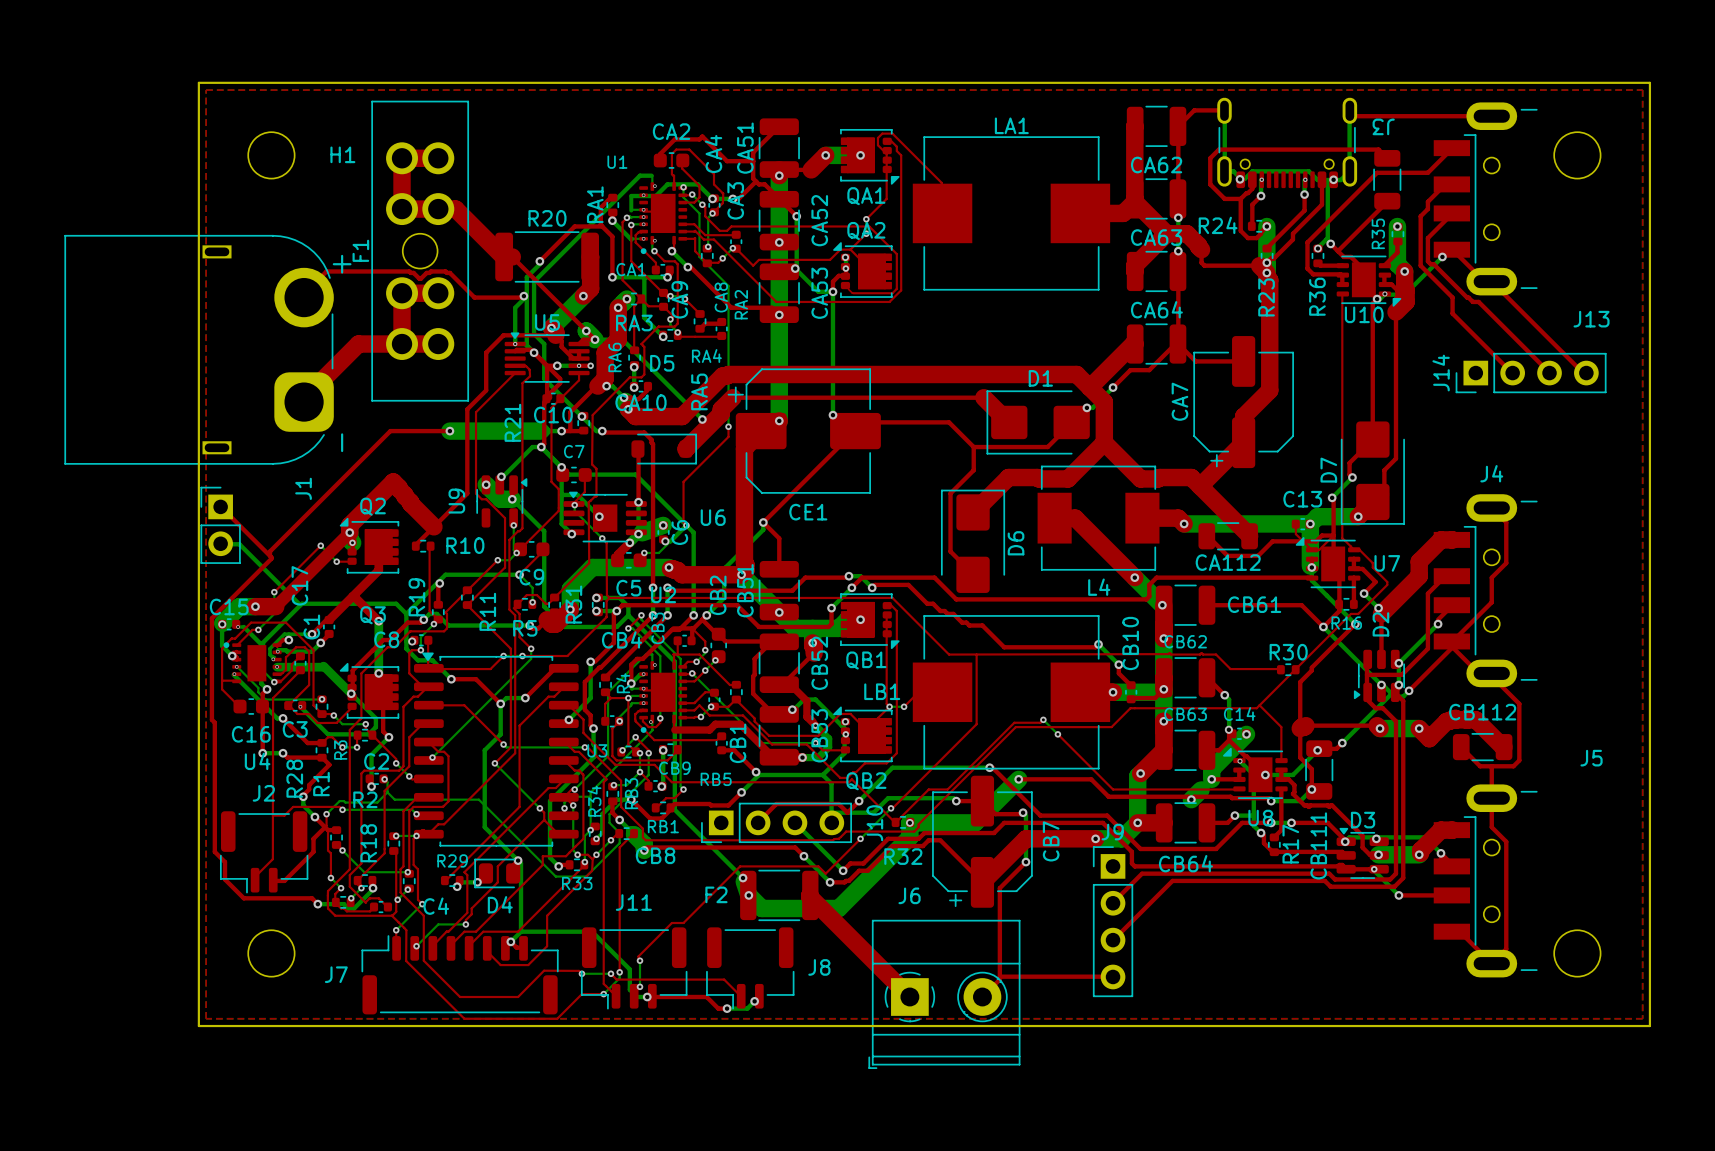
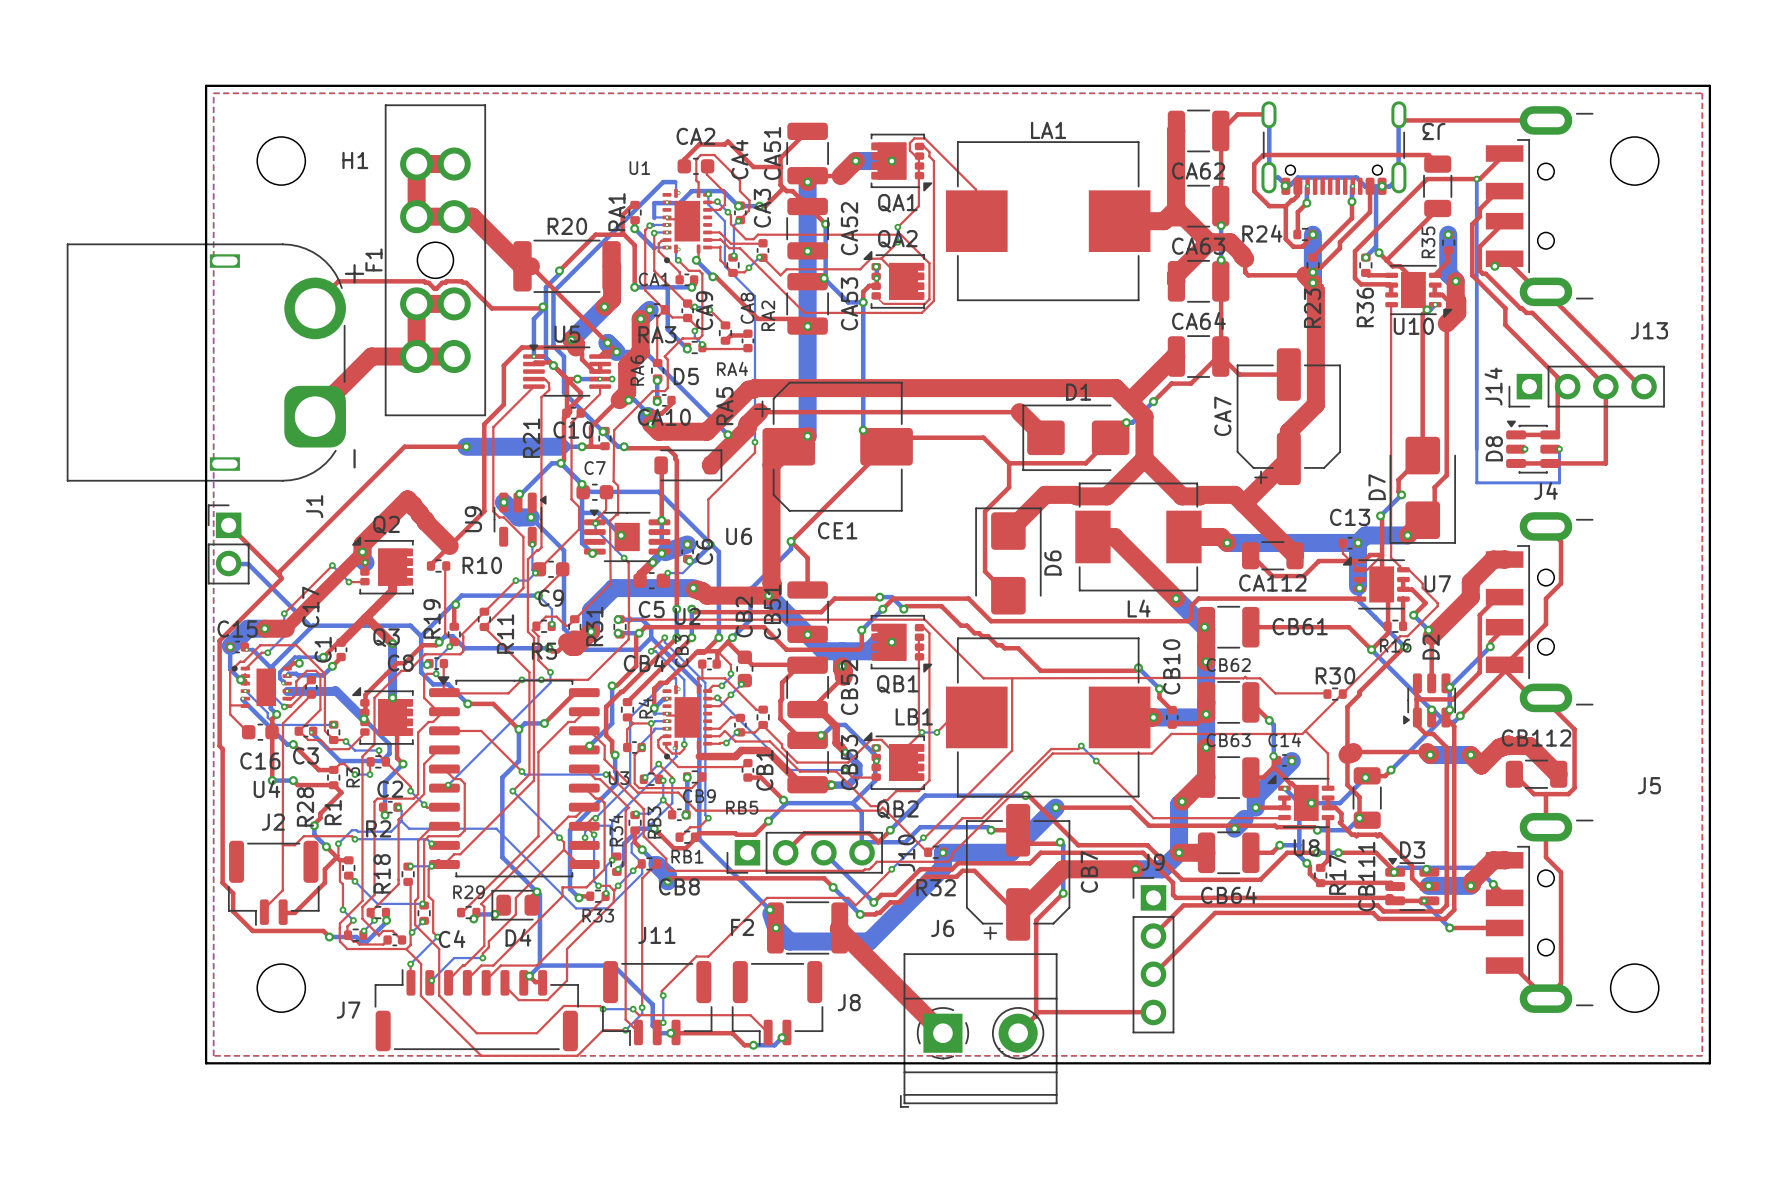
bottom track: none -> (1476, 179) (1476, 482) (1559, 482) (1559, 449)
via: none -> (1476, 179)
bottom track: (1442, 256) (1404, 294) (1384, 294) -> none
top track: none -> (1557, 377) (1557, 434) (1516, 434)
top track: none -> (1605, 386) (1605, 463) (1516, 463)
D8: none -> (1533, 447)
via: none -> (1525, 449)
via: none -> (1559, 449)

